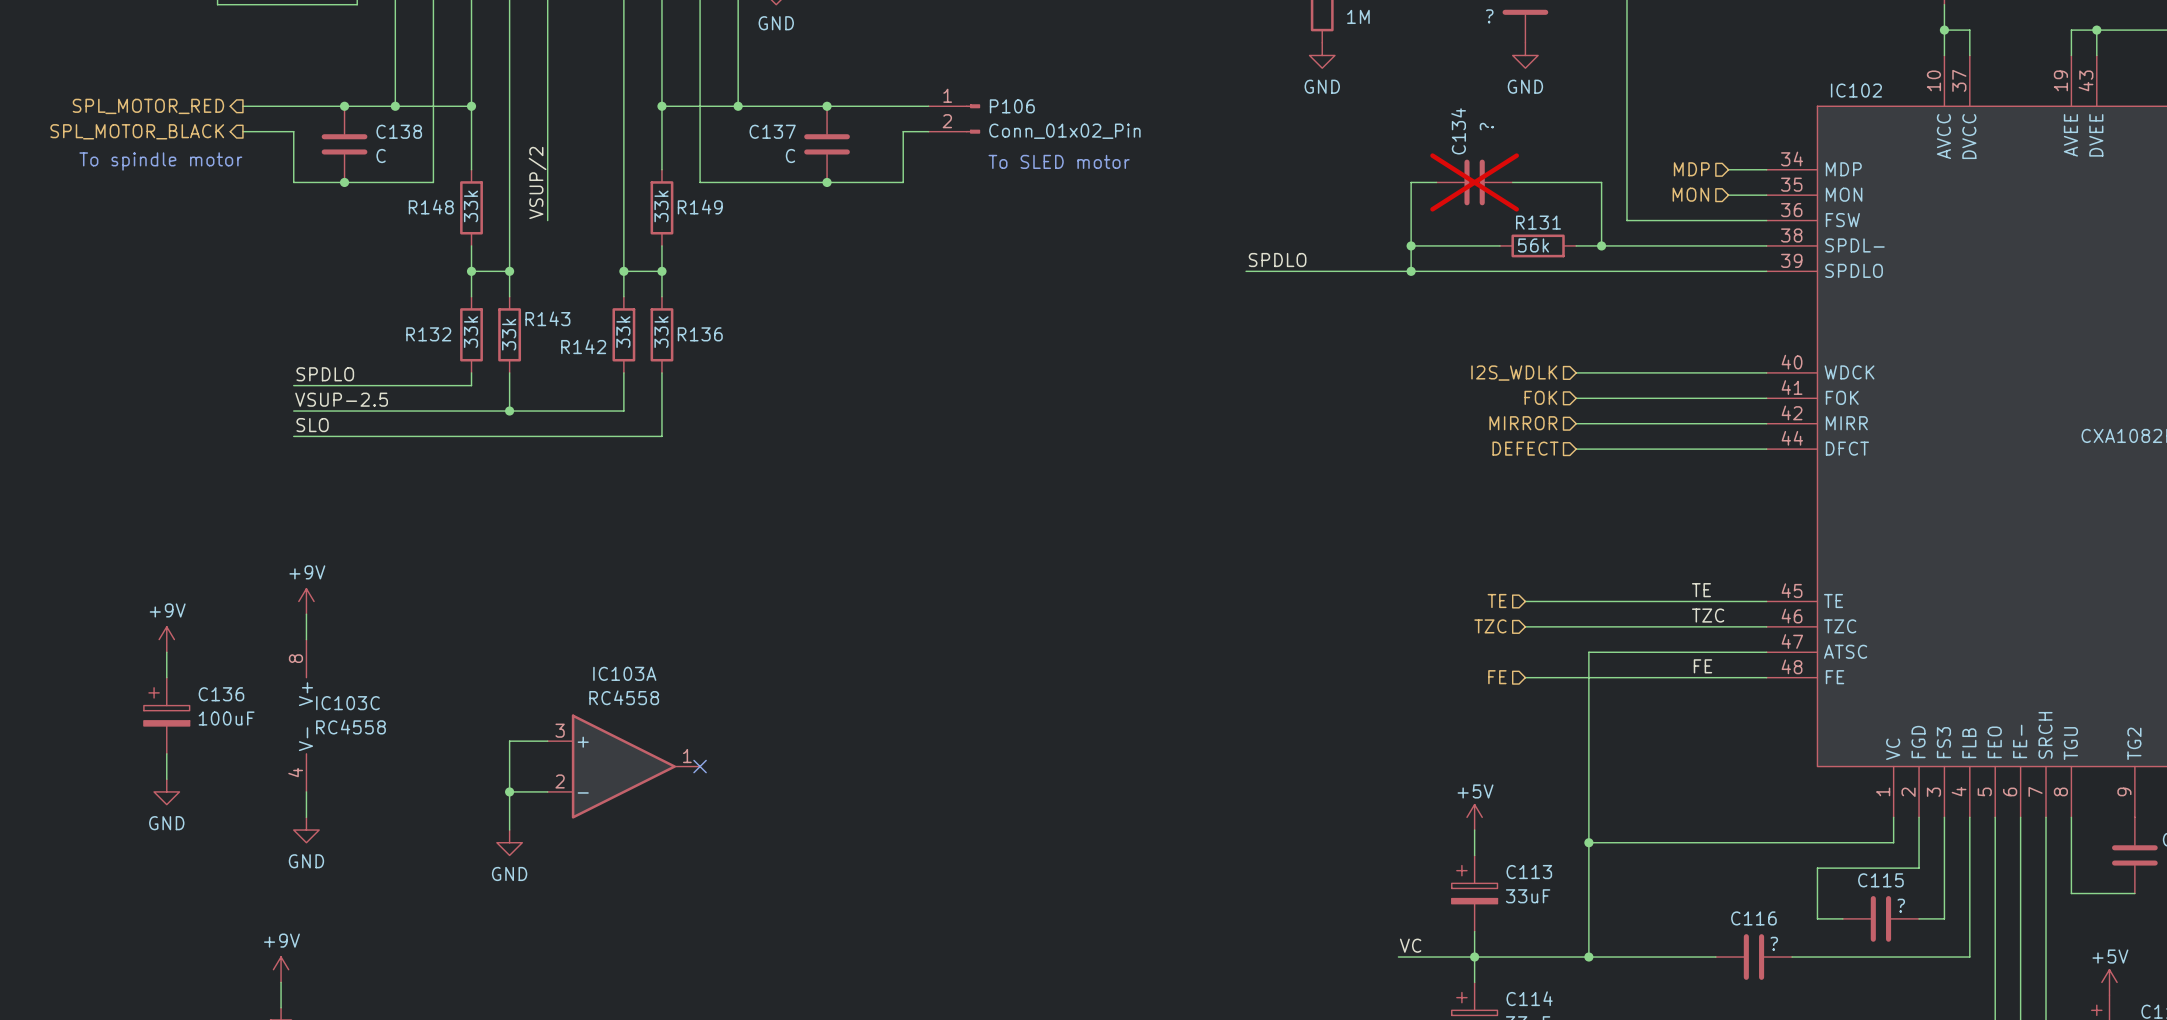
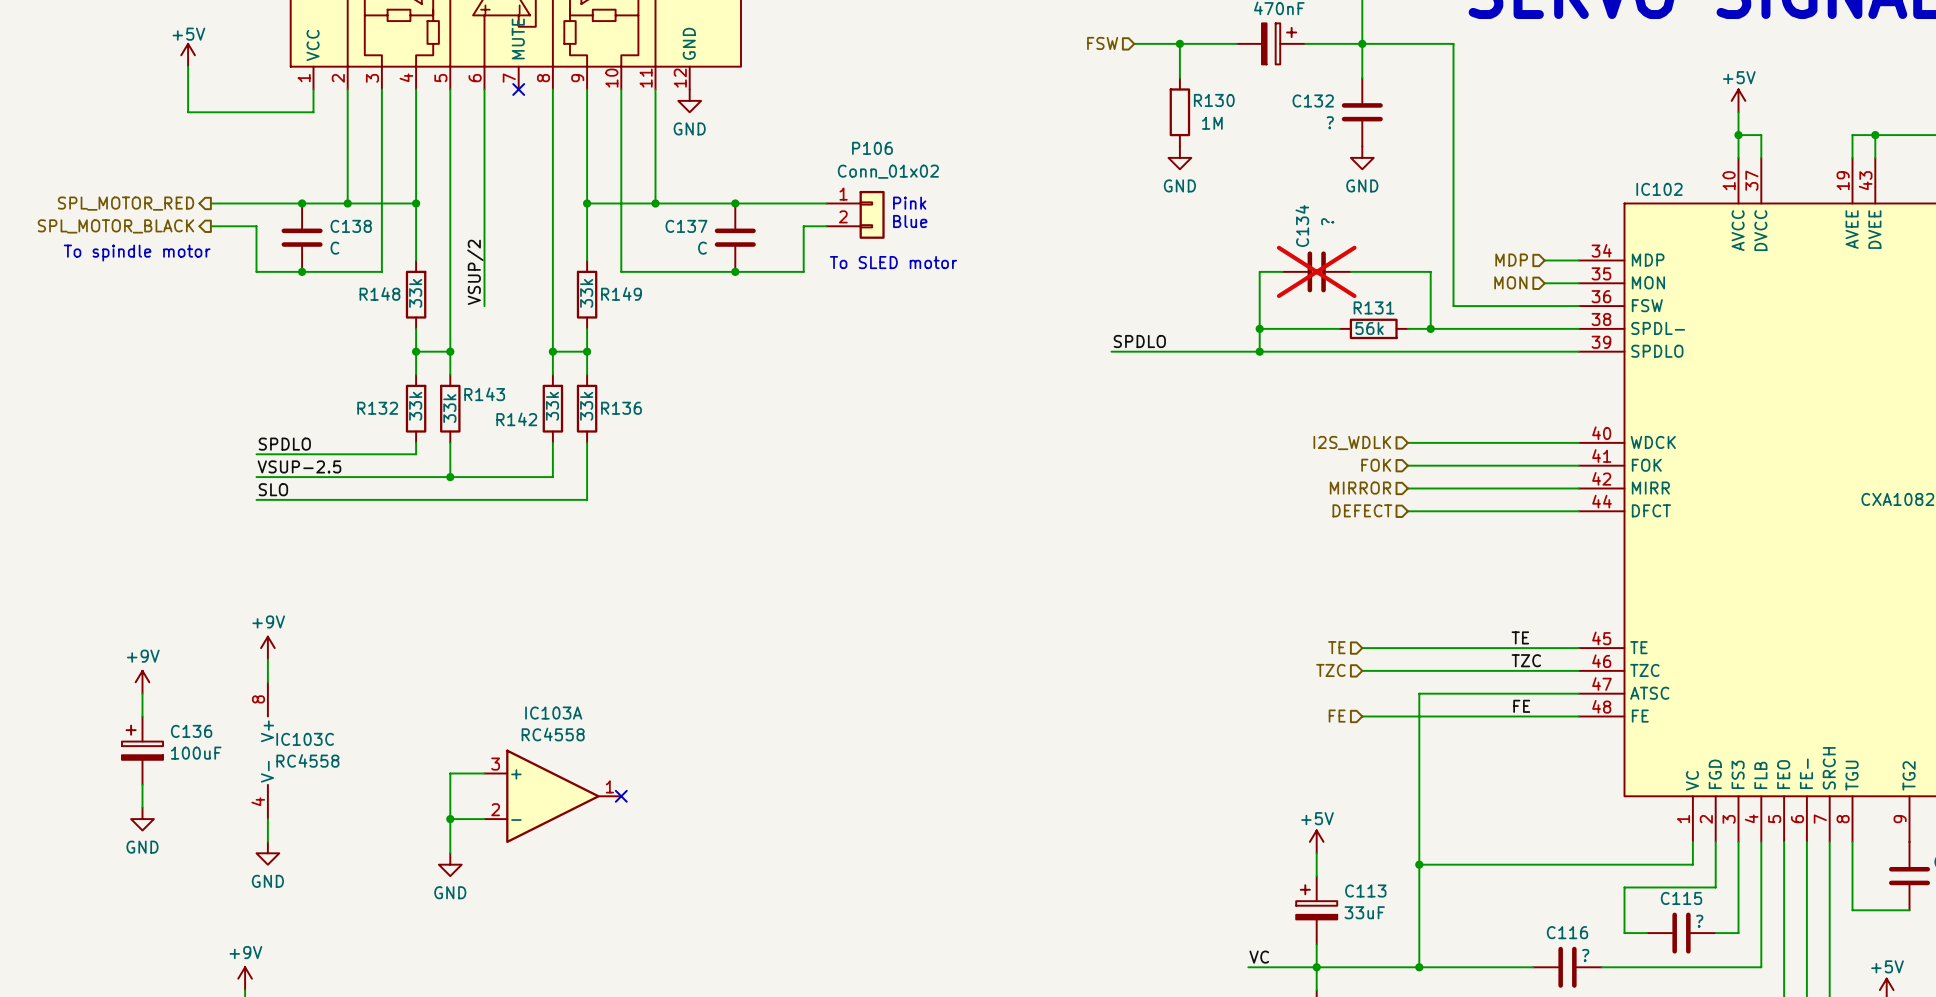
P106 symbol: [928, 104, 981, 134] -> [826, 190, 885, 239]
text: none -> Pink (909, 203)
P106 name position: P106 (1012, 106) -> P106 (872, 148)
text: none -> Blue (910, 221)
P106 value: Conn_01x02_Pin (1064, 131) -> Conn_01x02 (888, 171)
text position: To SLED motor (1059, 161) -> To SLED motor (893, 262)

